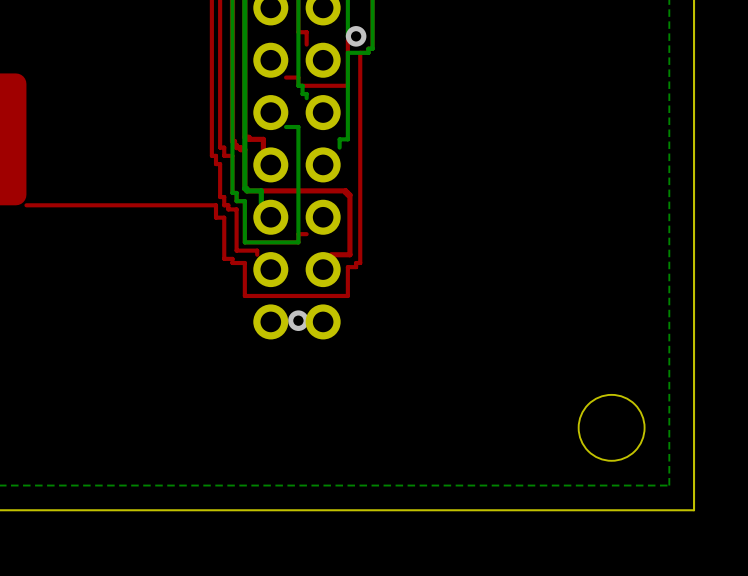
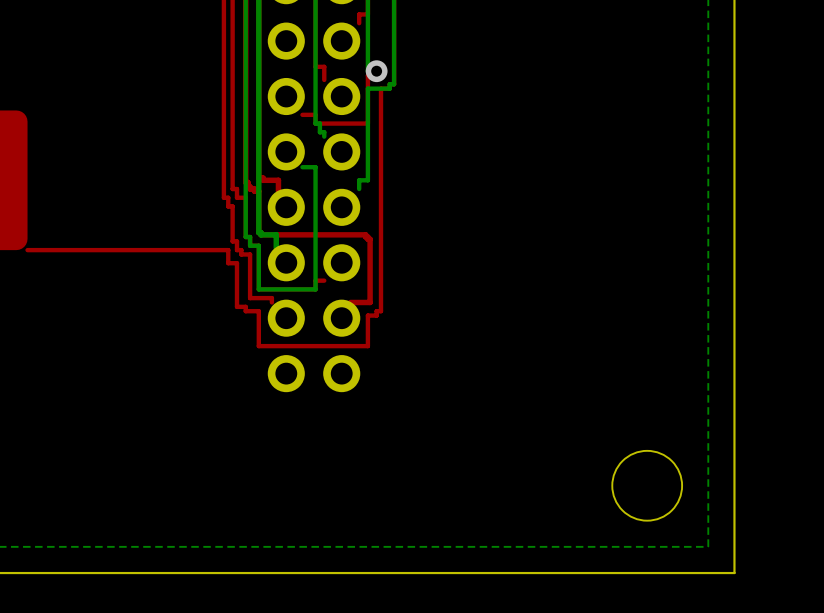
via: (298, 320) -> none

